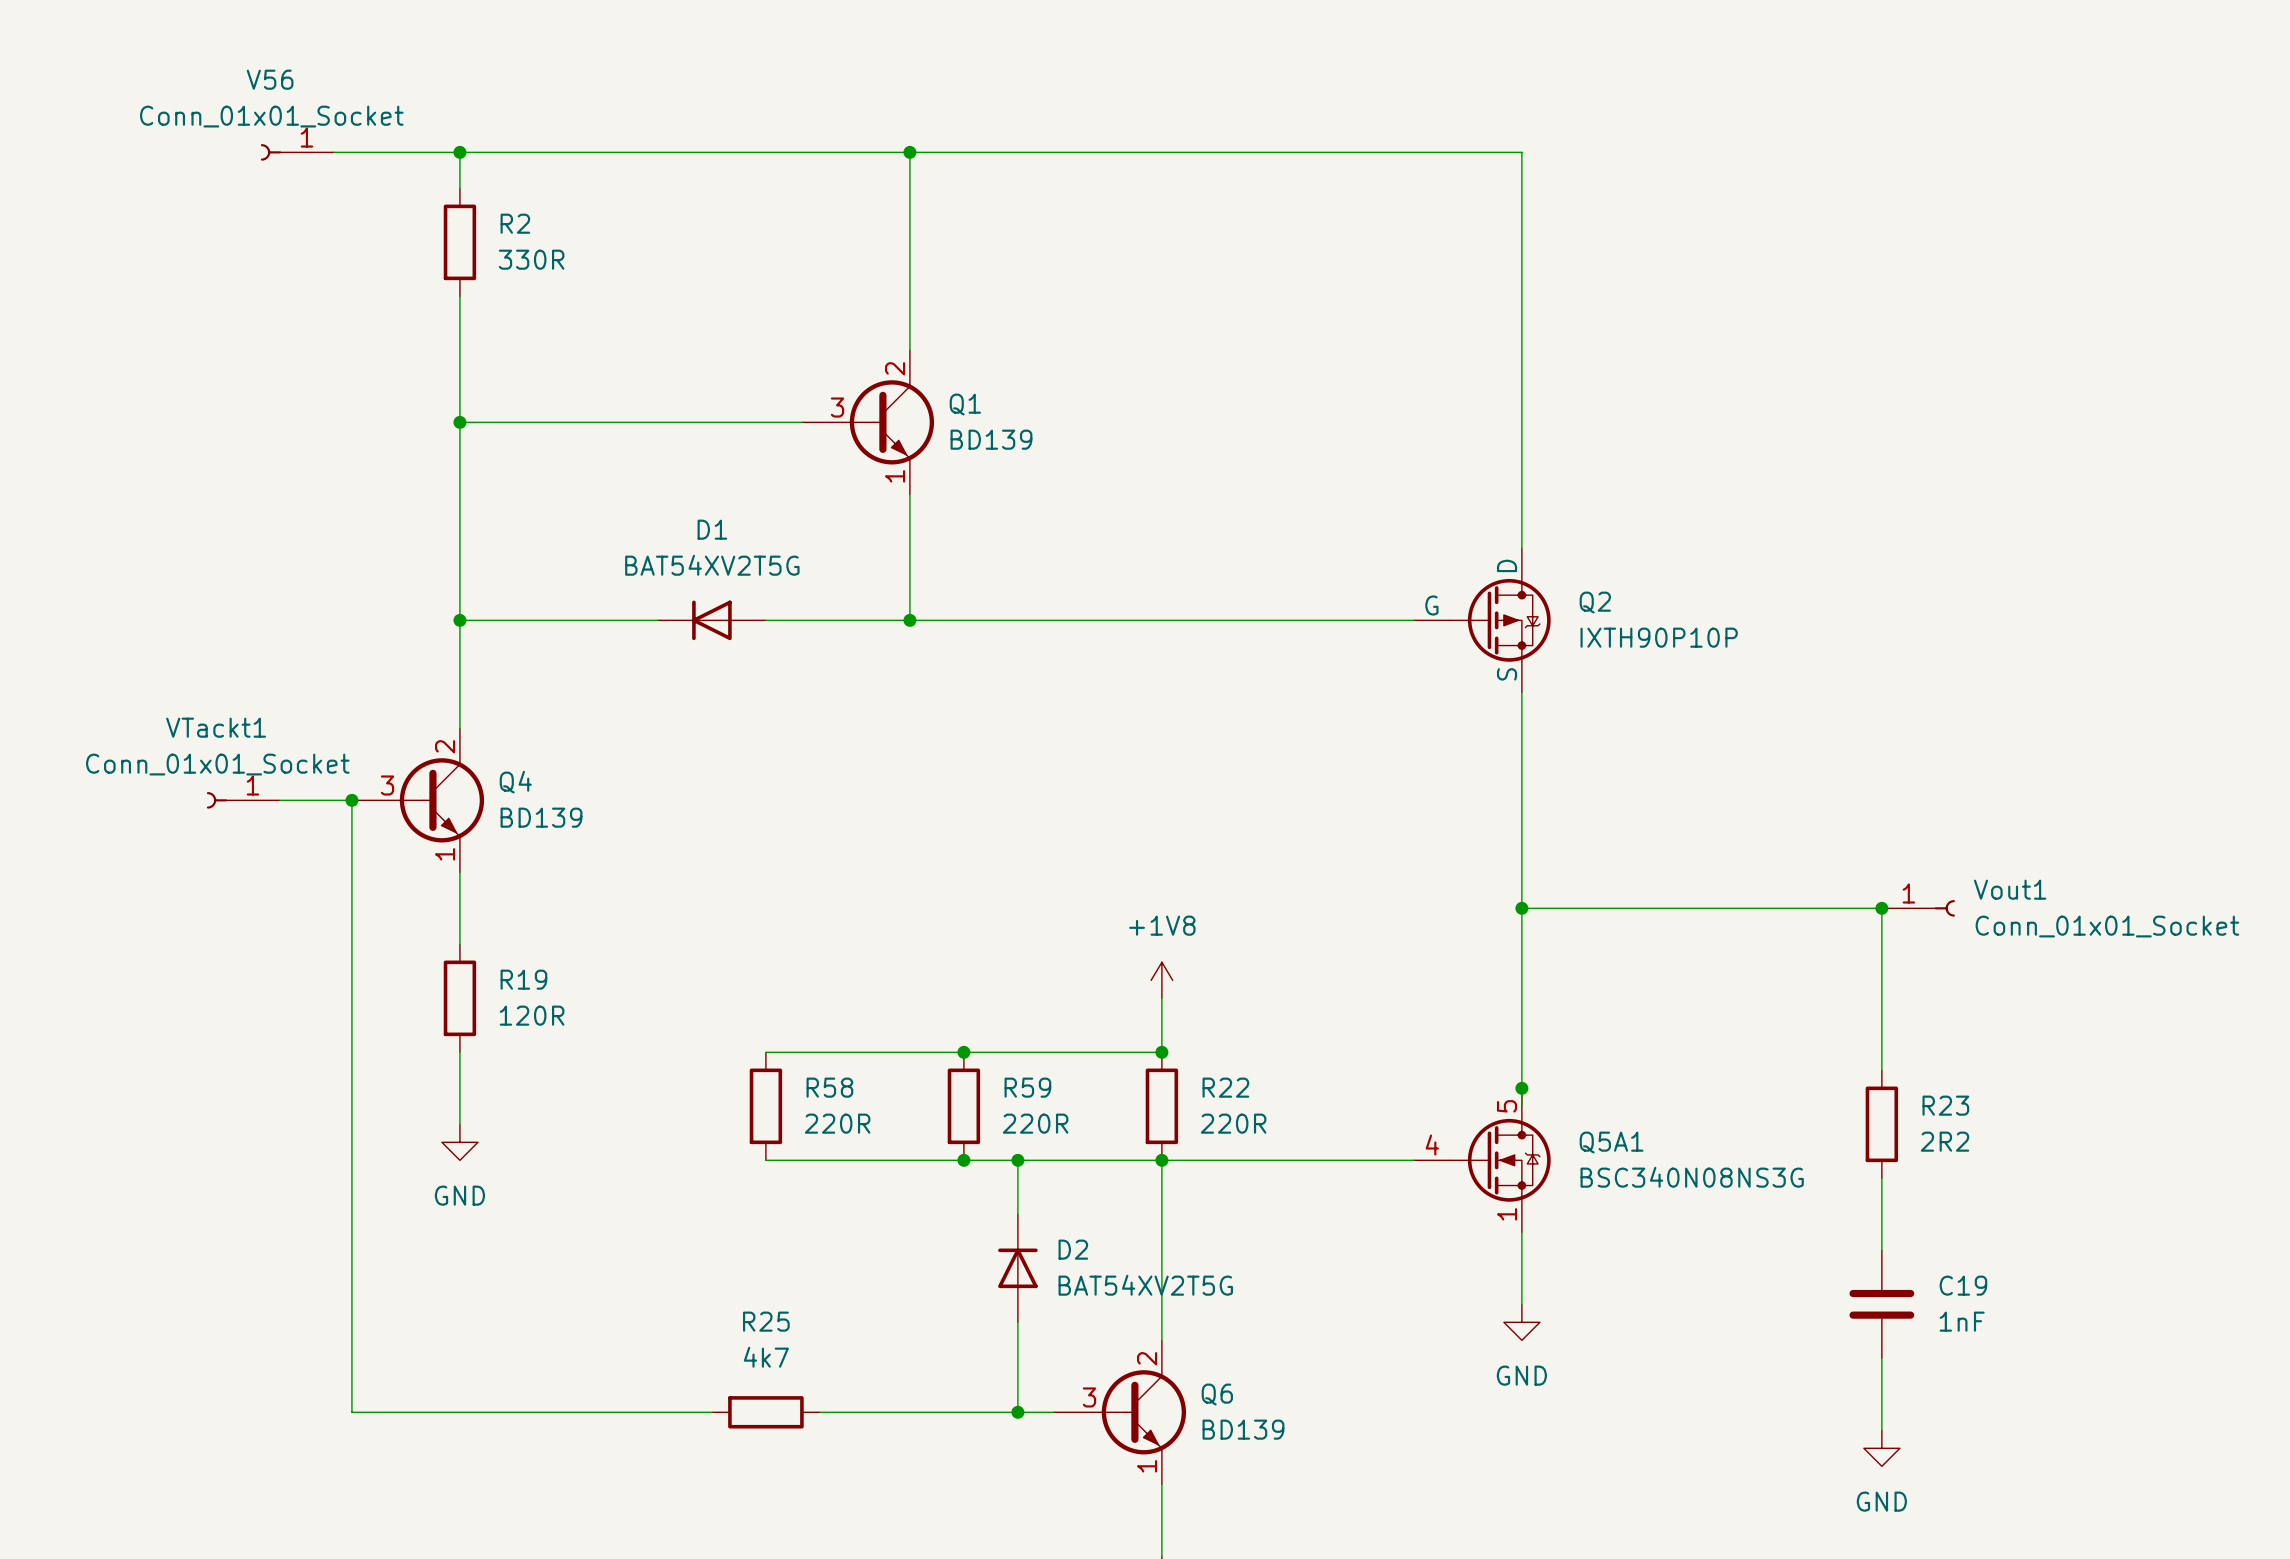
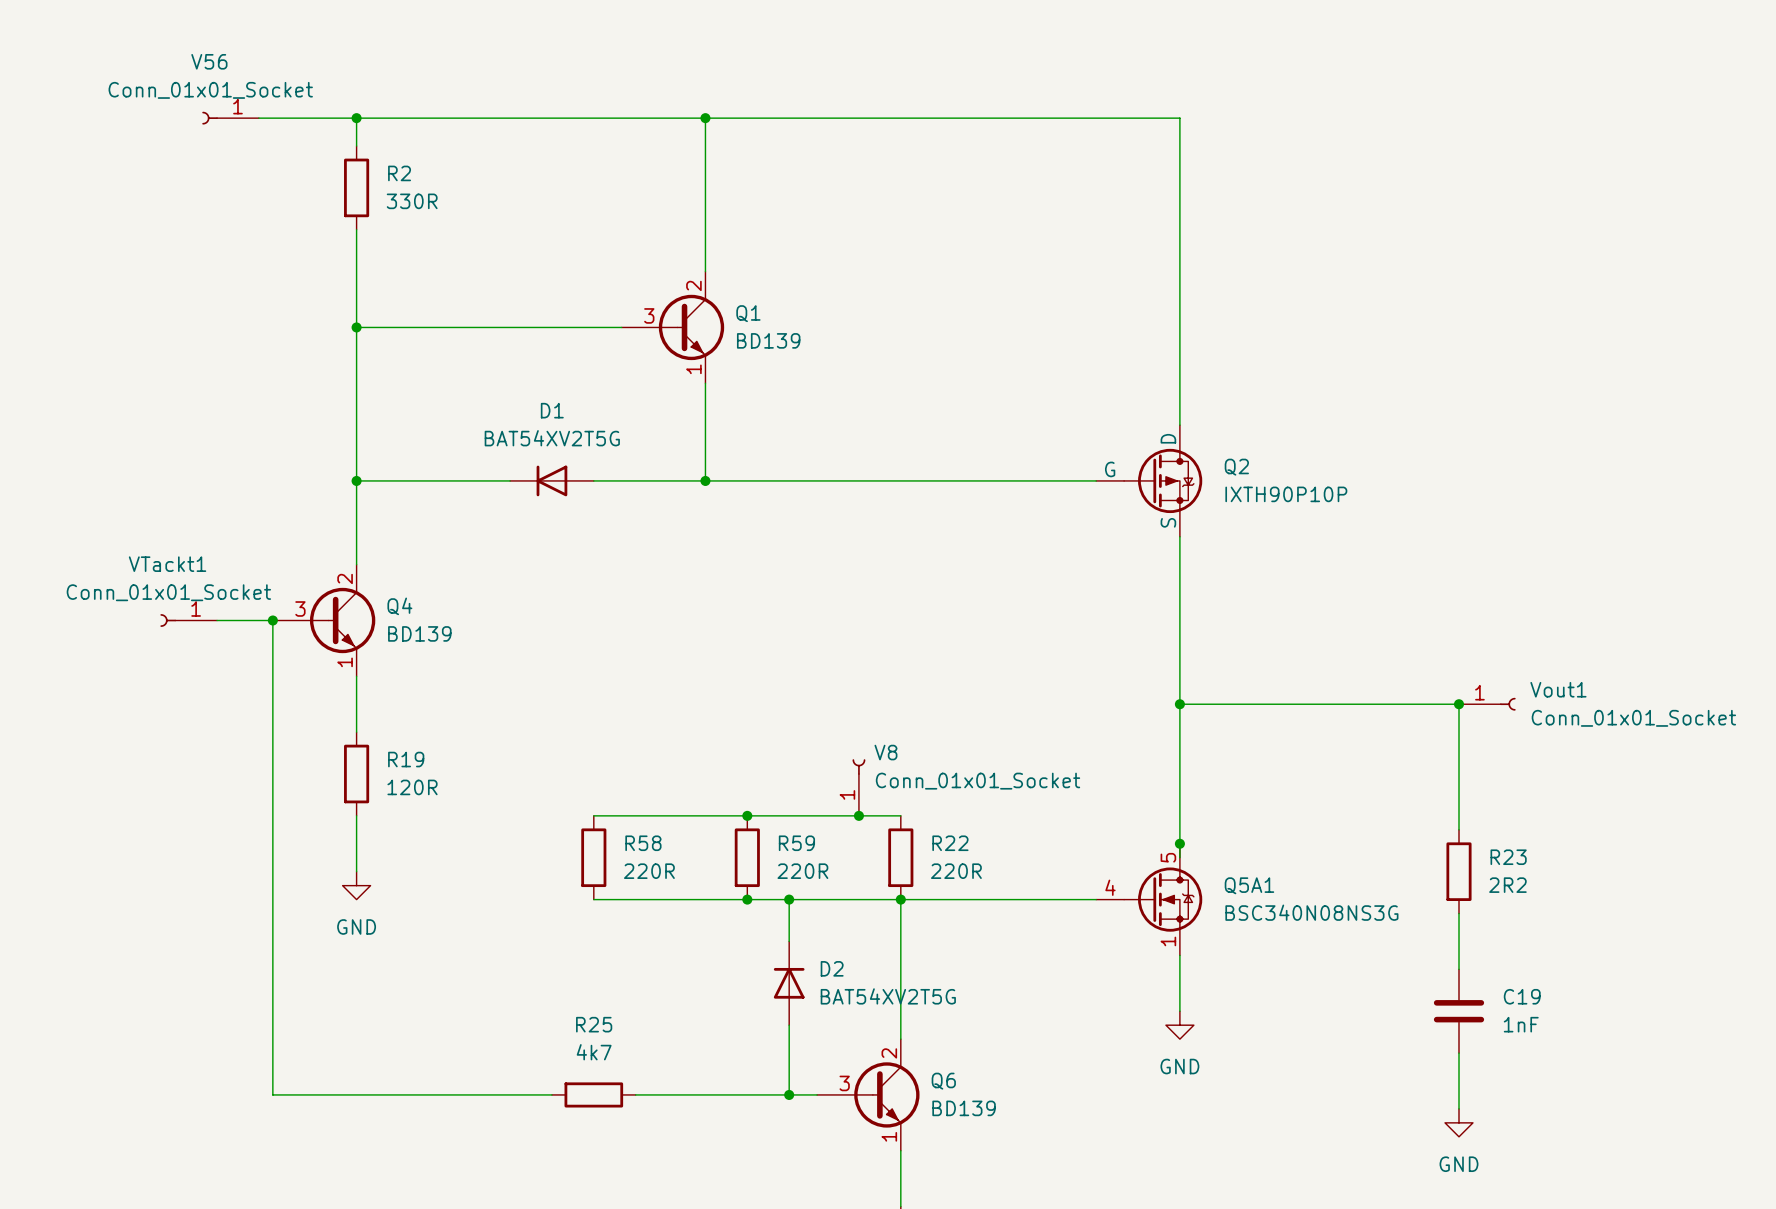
power symbol: +1V8 (1161, 980) -> none
wire: (1161, 998) (1161, 1052) -> none
V8: none -> Conn_01x01_Socket (858, 787)
junction position: (1161, 1052) -> (858, 815)

